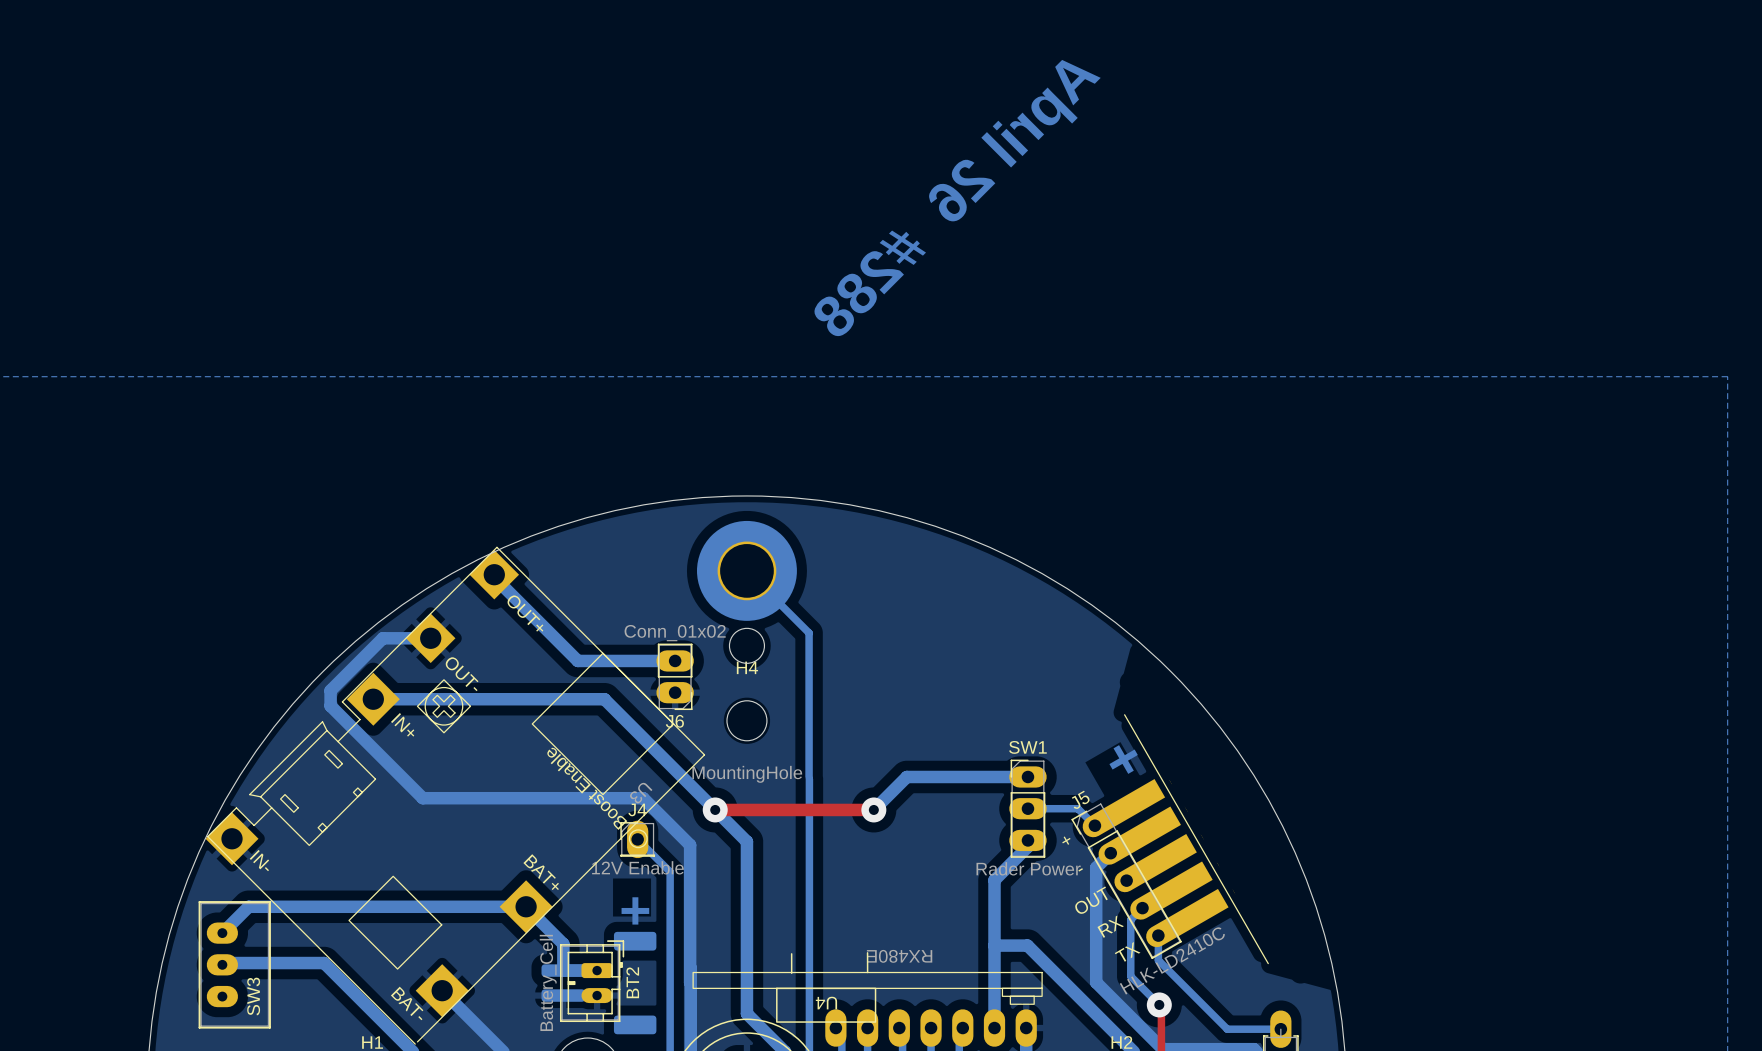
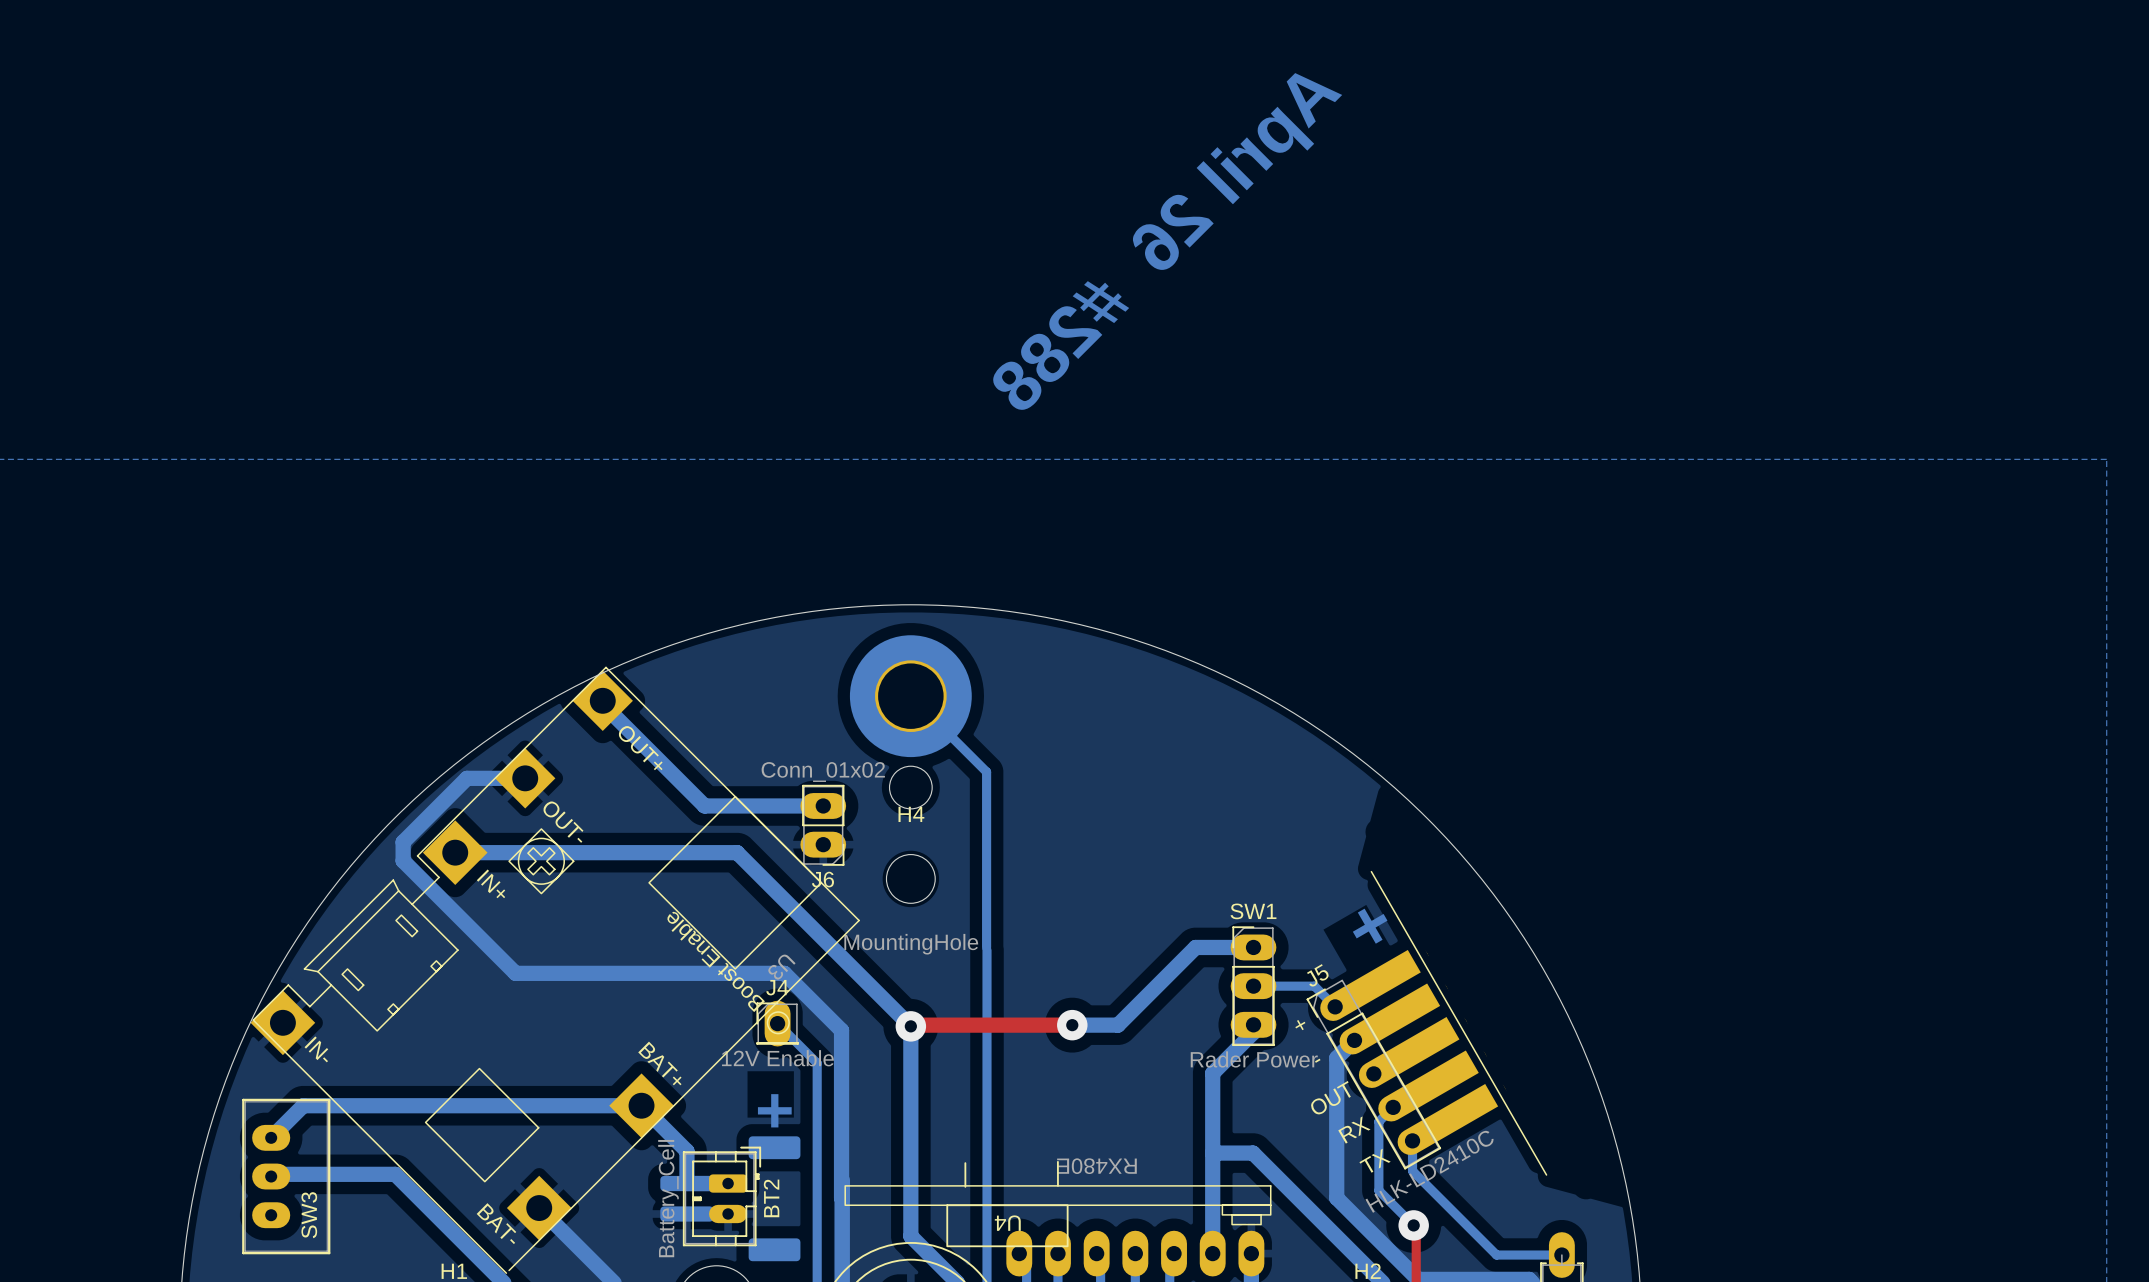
bottom track: (980, 776) (906, 776) (873, 809) -> (1195, 947) (1117, 1025) (1072, 1025)
top track: (715, 809) (873, 809) -> none
via position: (715, 809) -> (910, 1026)
via position: (873, 809) -> (1072, 1025)
top track: none -> (1072, 1025) (910, 1026)

